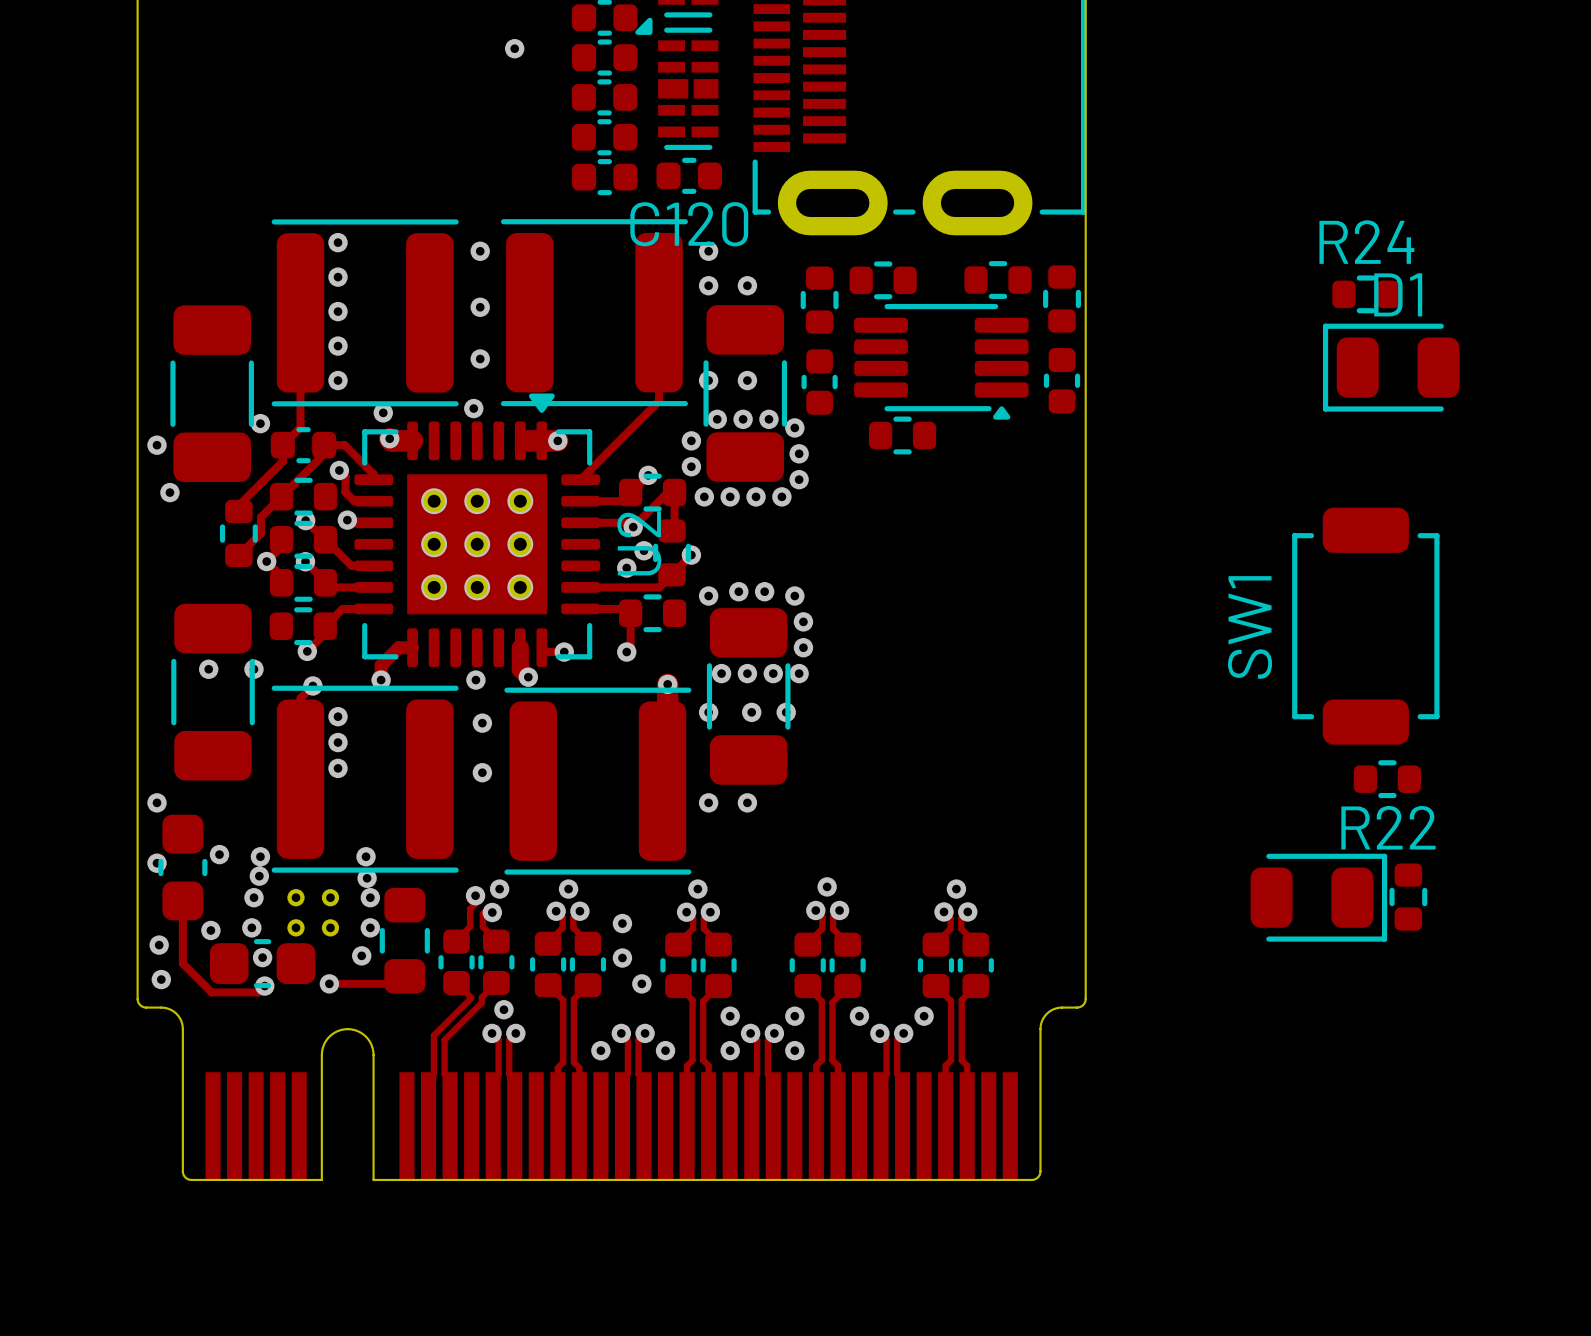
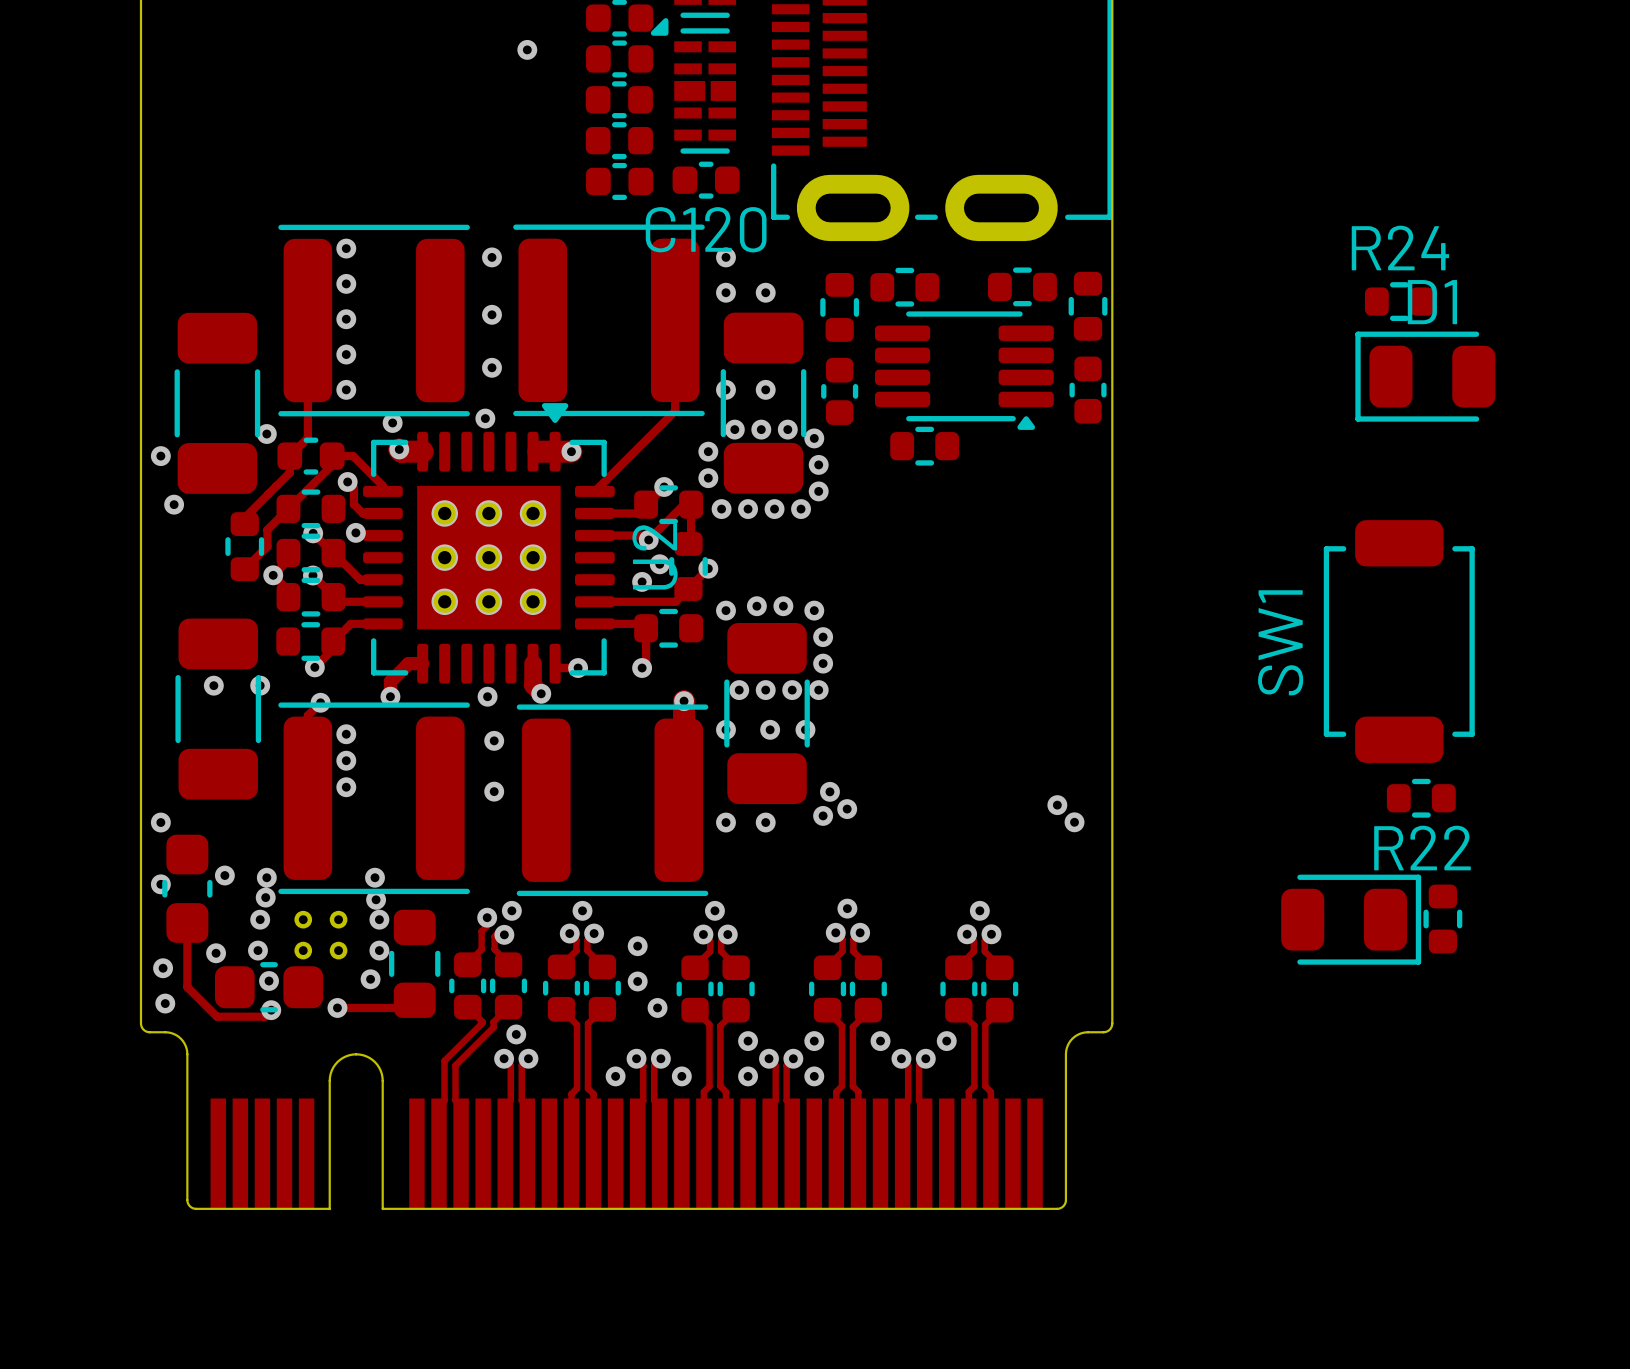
via: none -> (829, 791)
via: none -> (1057, 805)
via: none -> (847, 809)
via: none -> (823, 815)
via: none -> (1074, 822)

